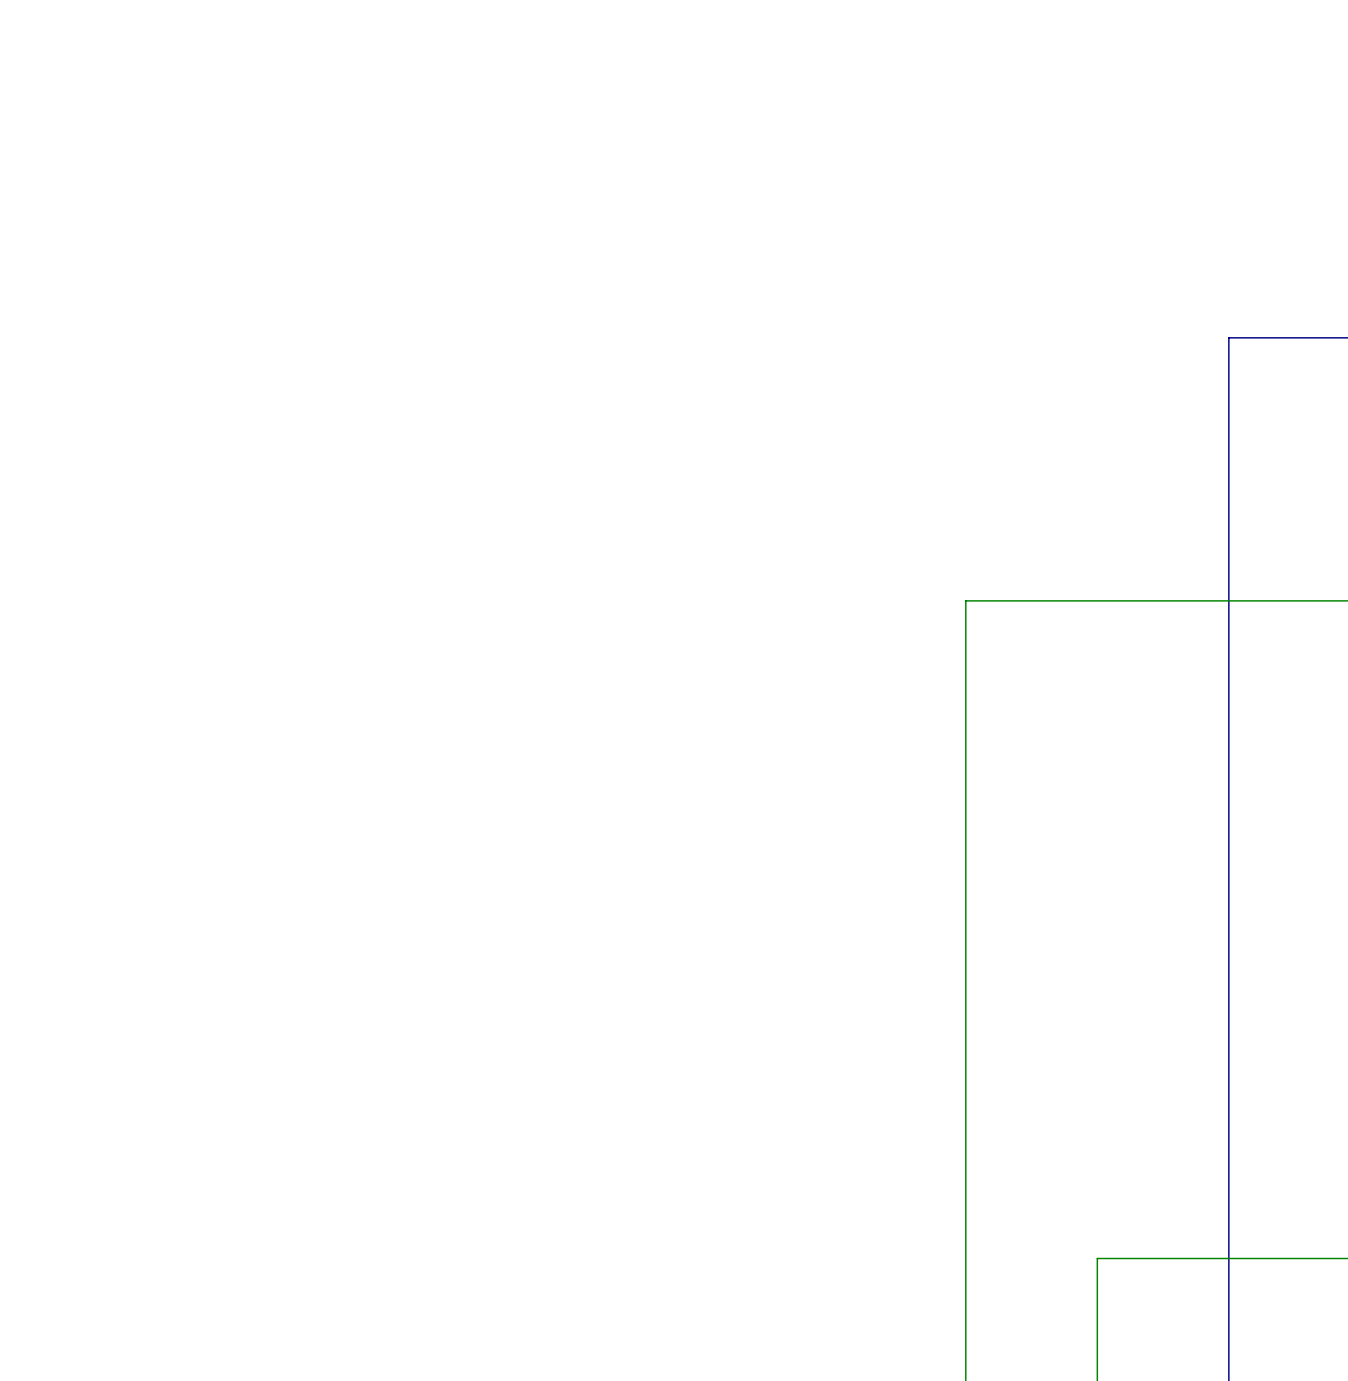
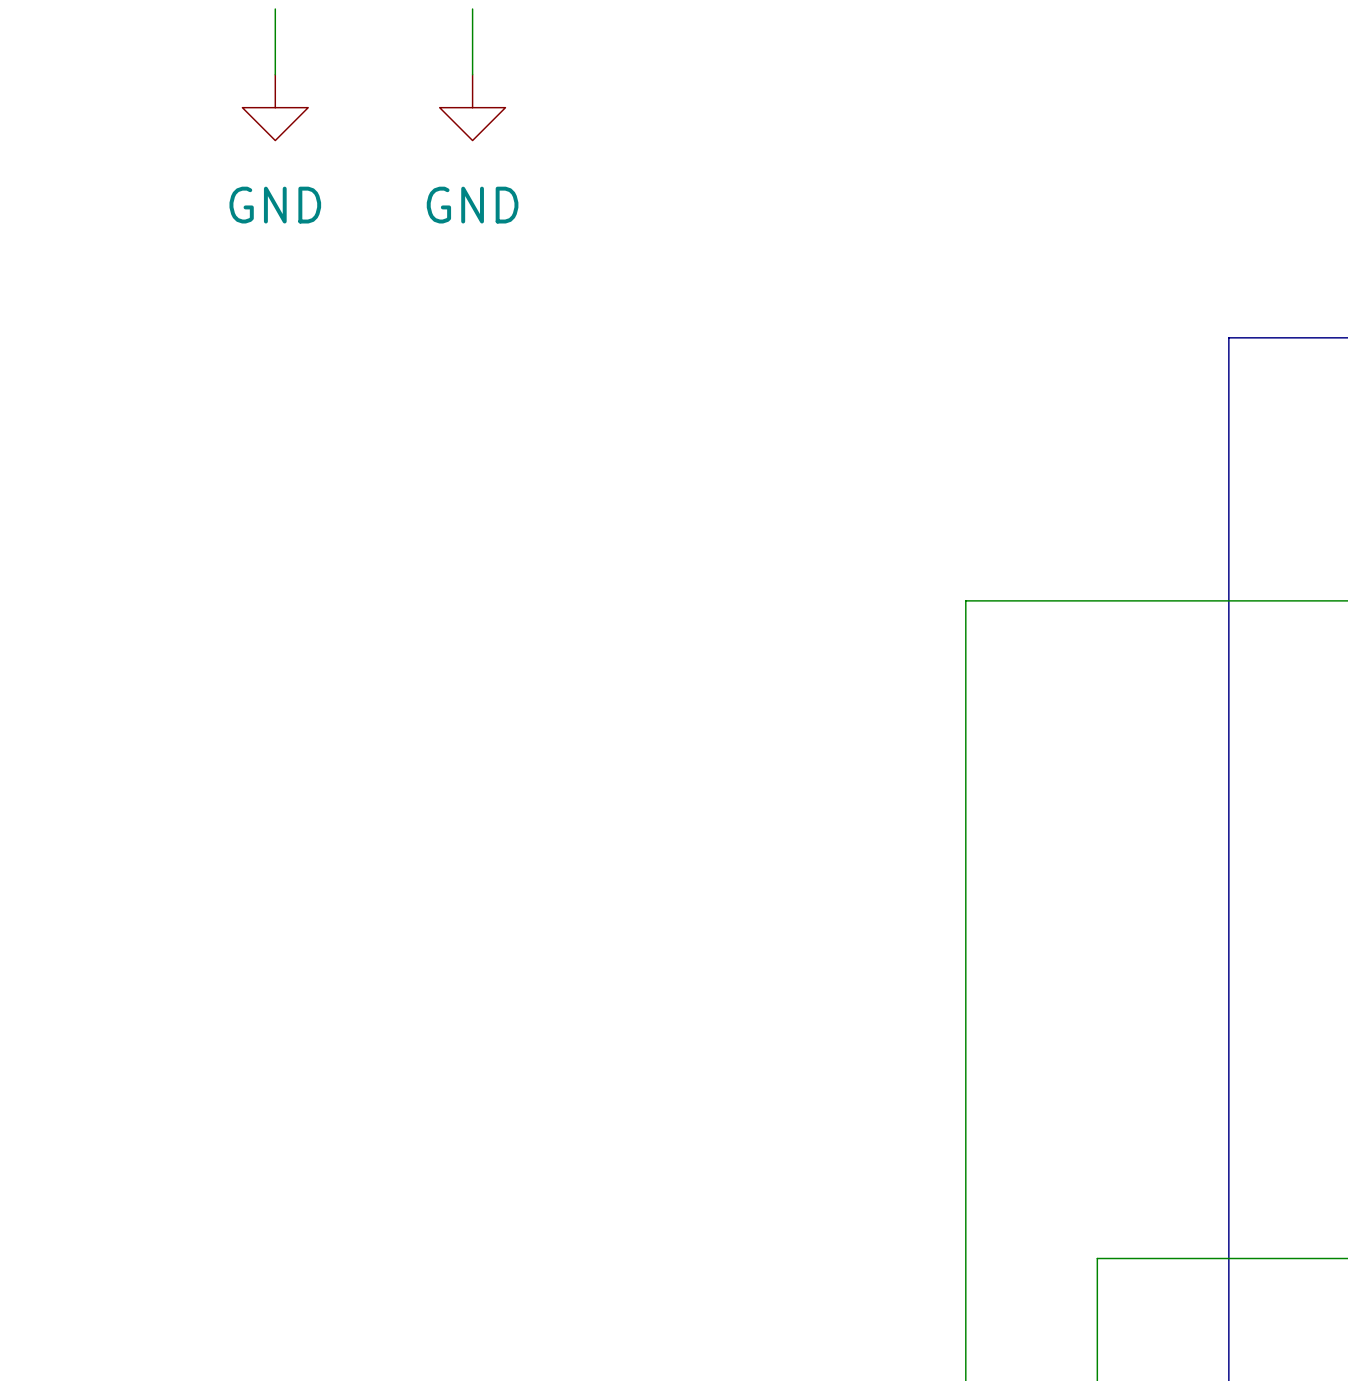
wire: none -> (275, 9) (275, 74)
wire: none -> (472, 9) (472, 74)
power symbol: none -> GND (275, 107)
power symbol: none -> GND (472, 107)

